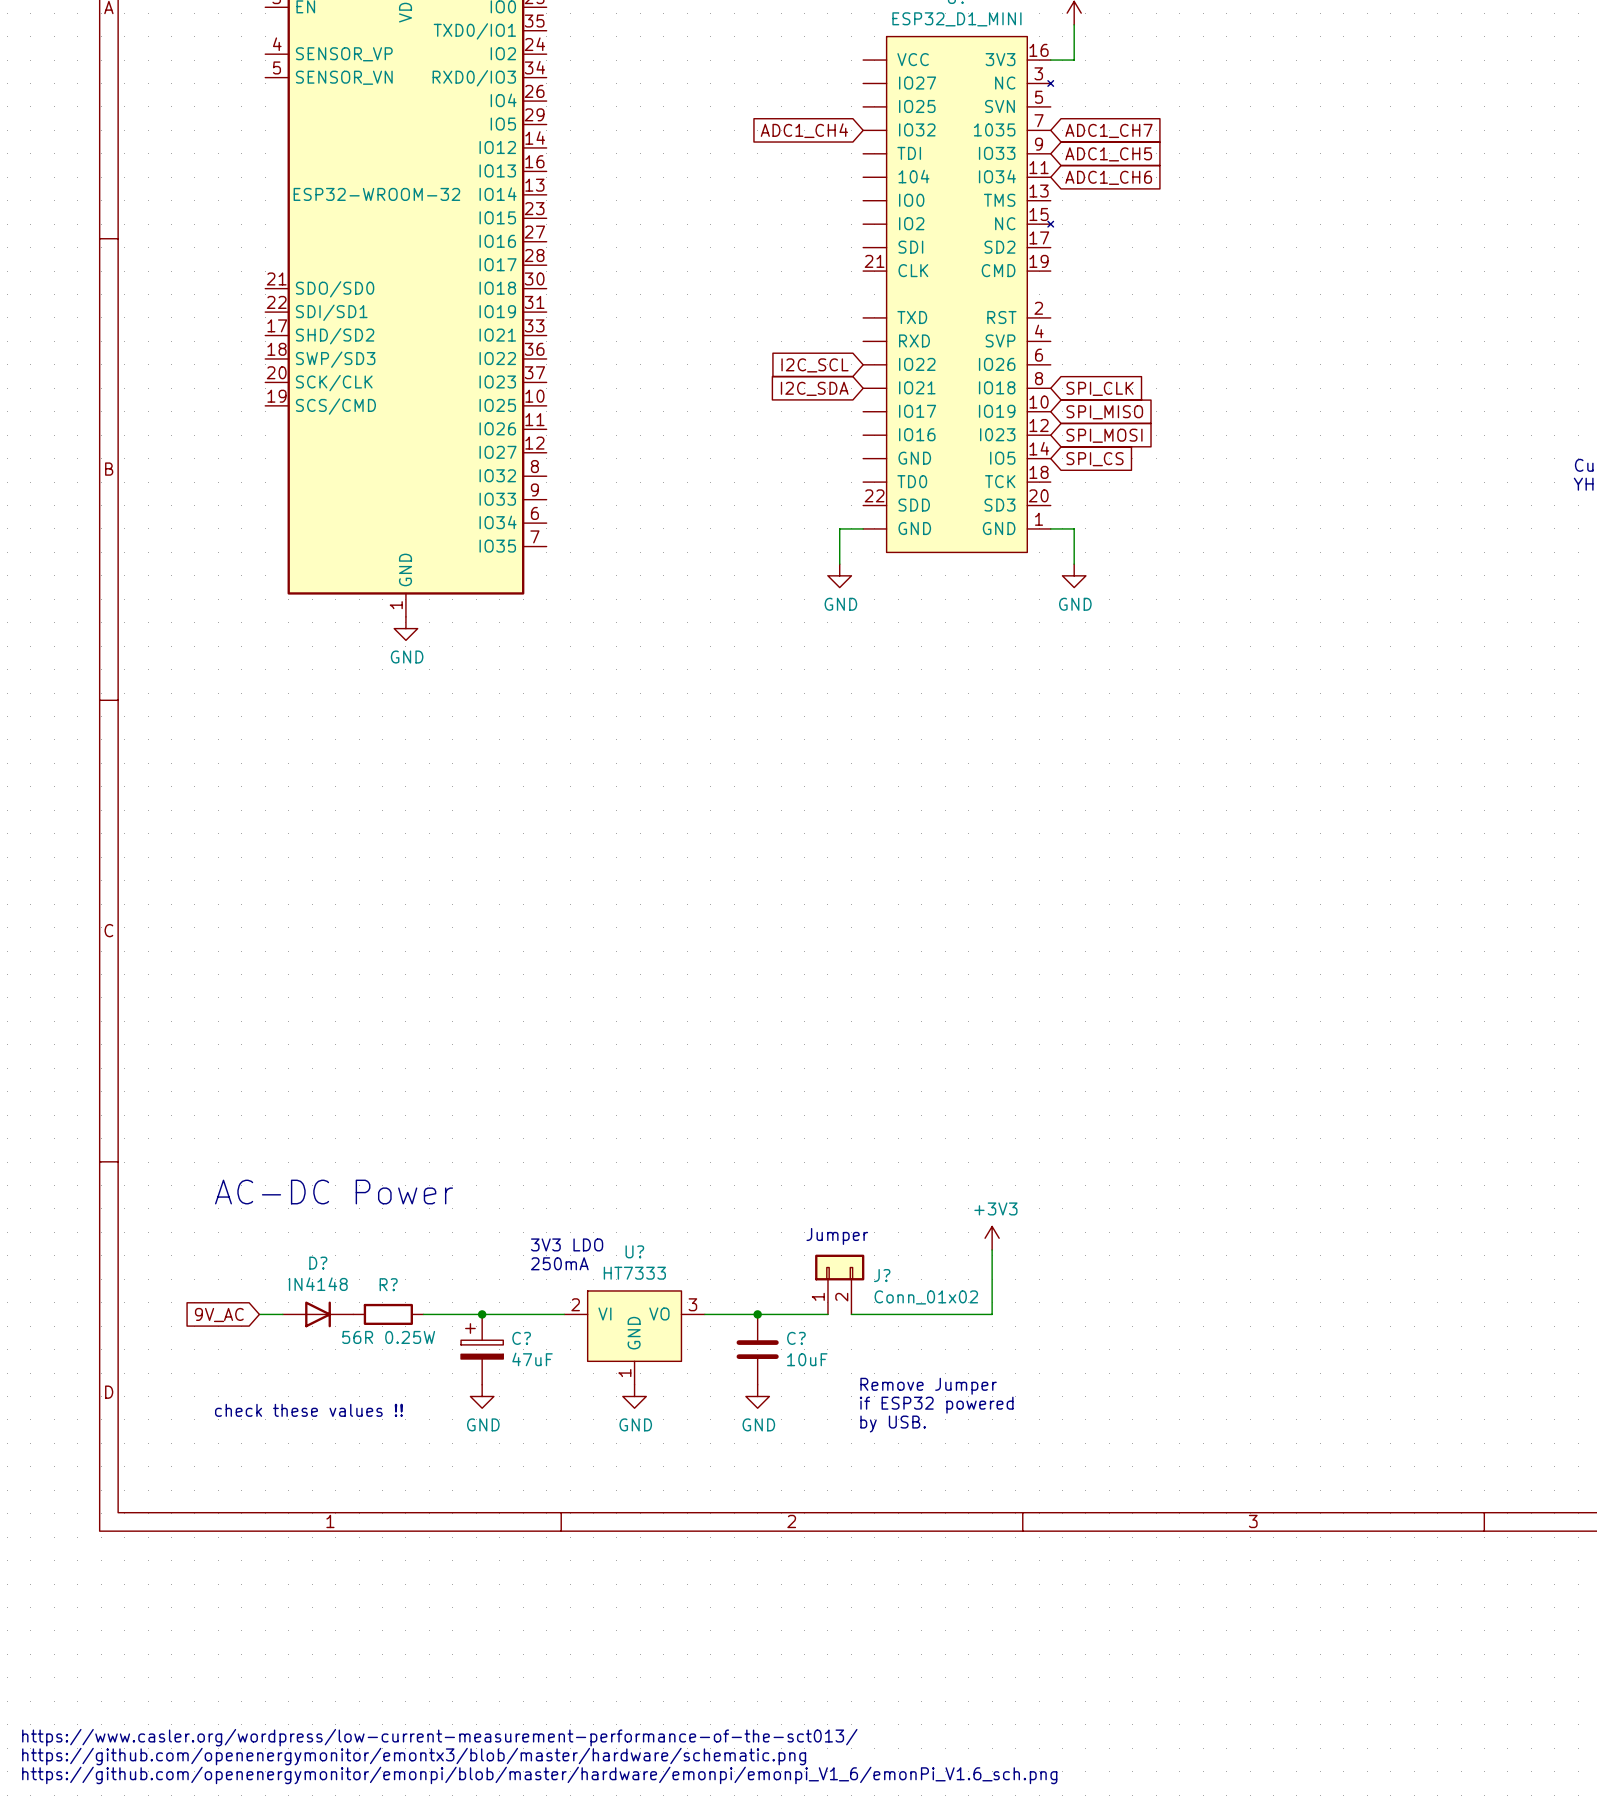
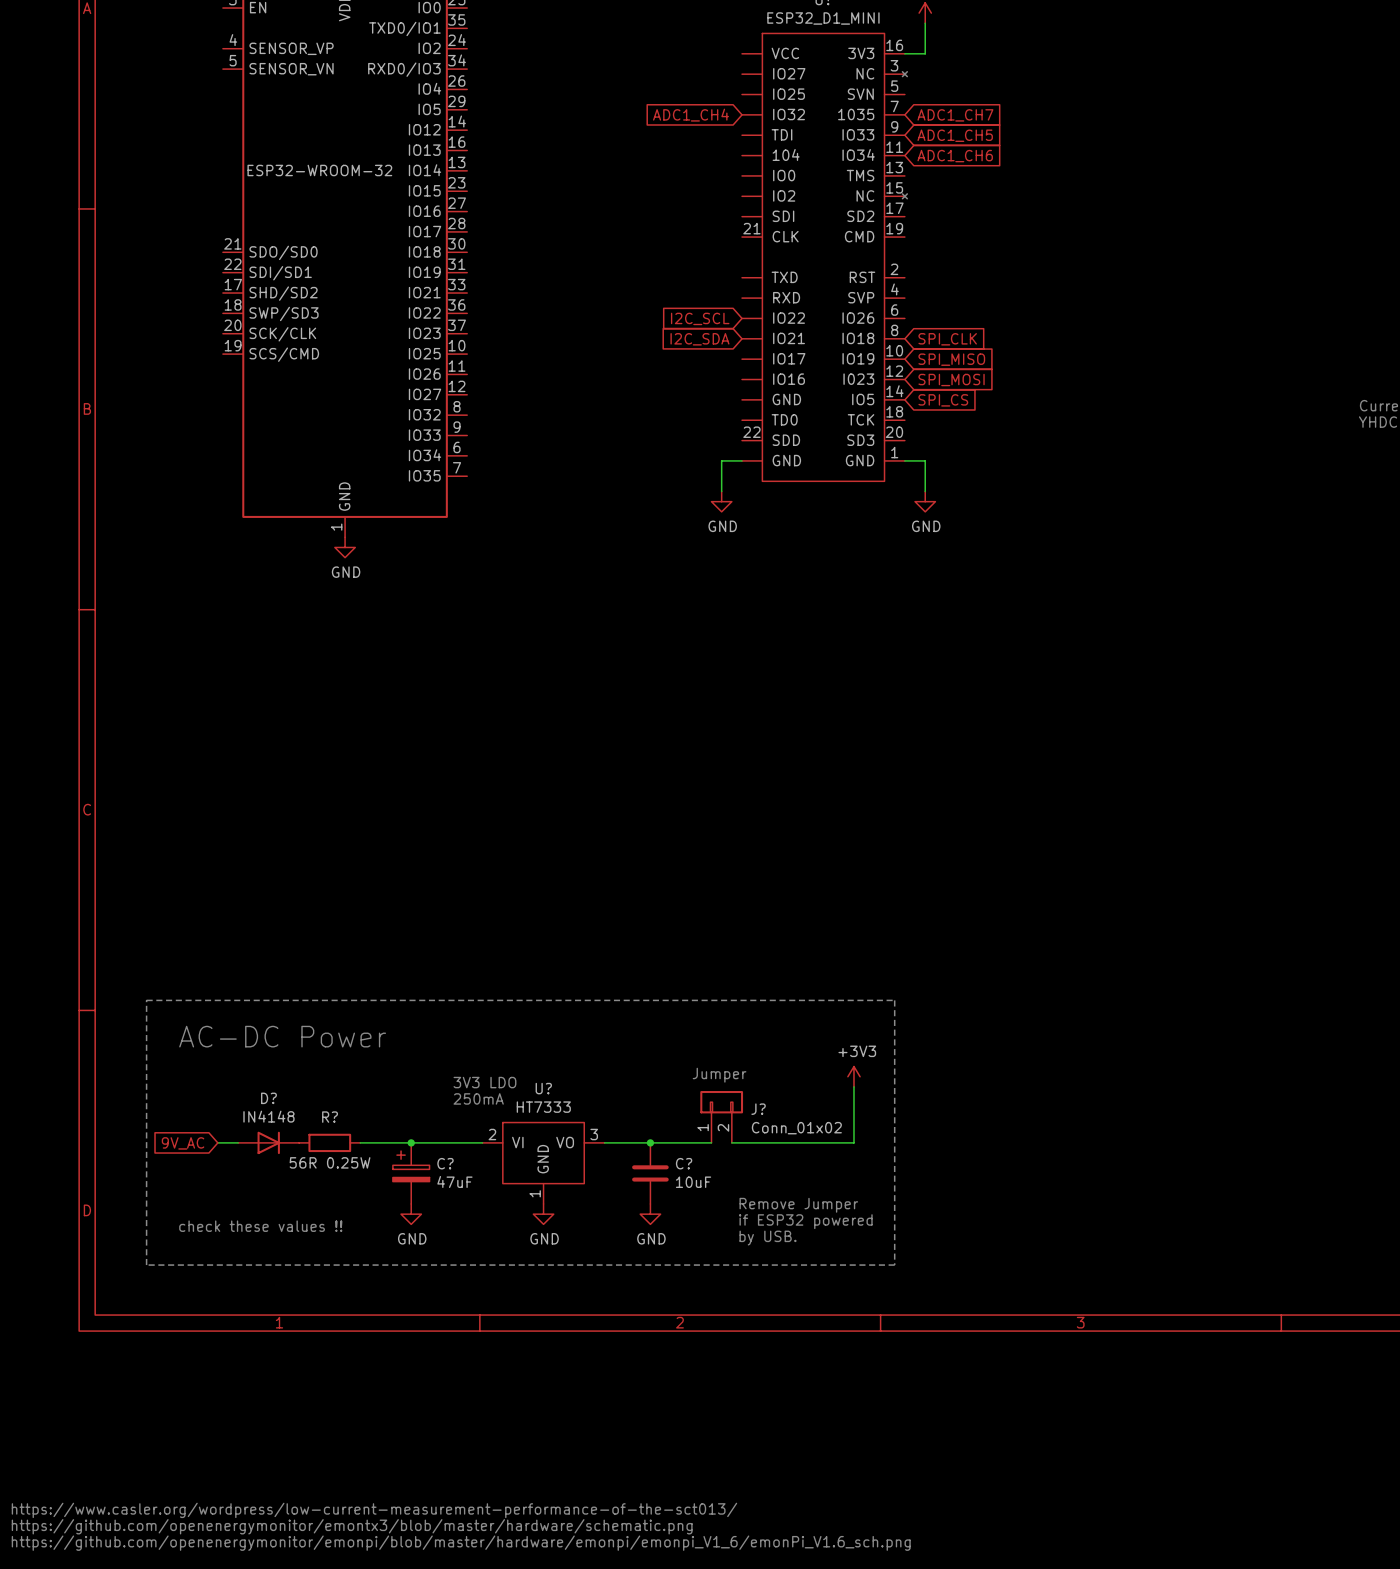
line: none -> (146, 1000) (146, 1265) (894, 1265) (894, 1000) (146, 1000)

